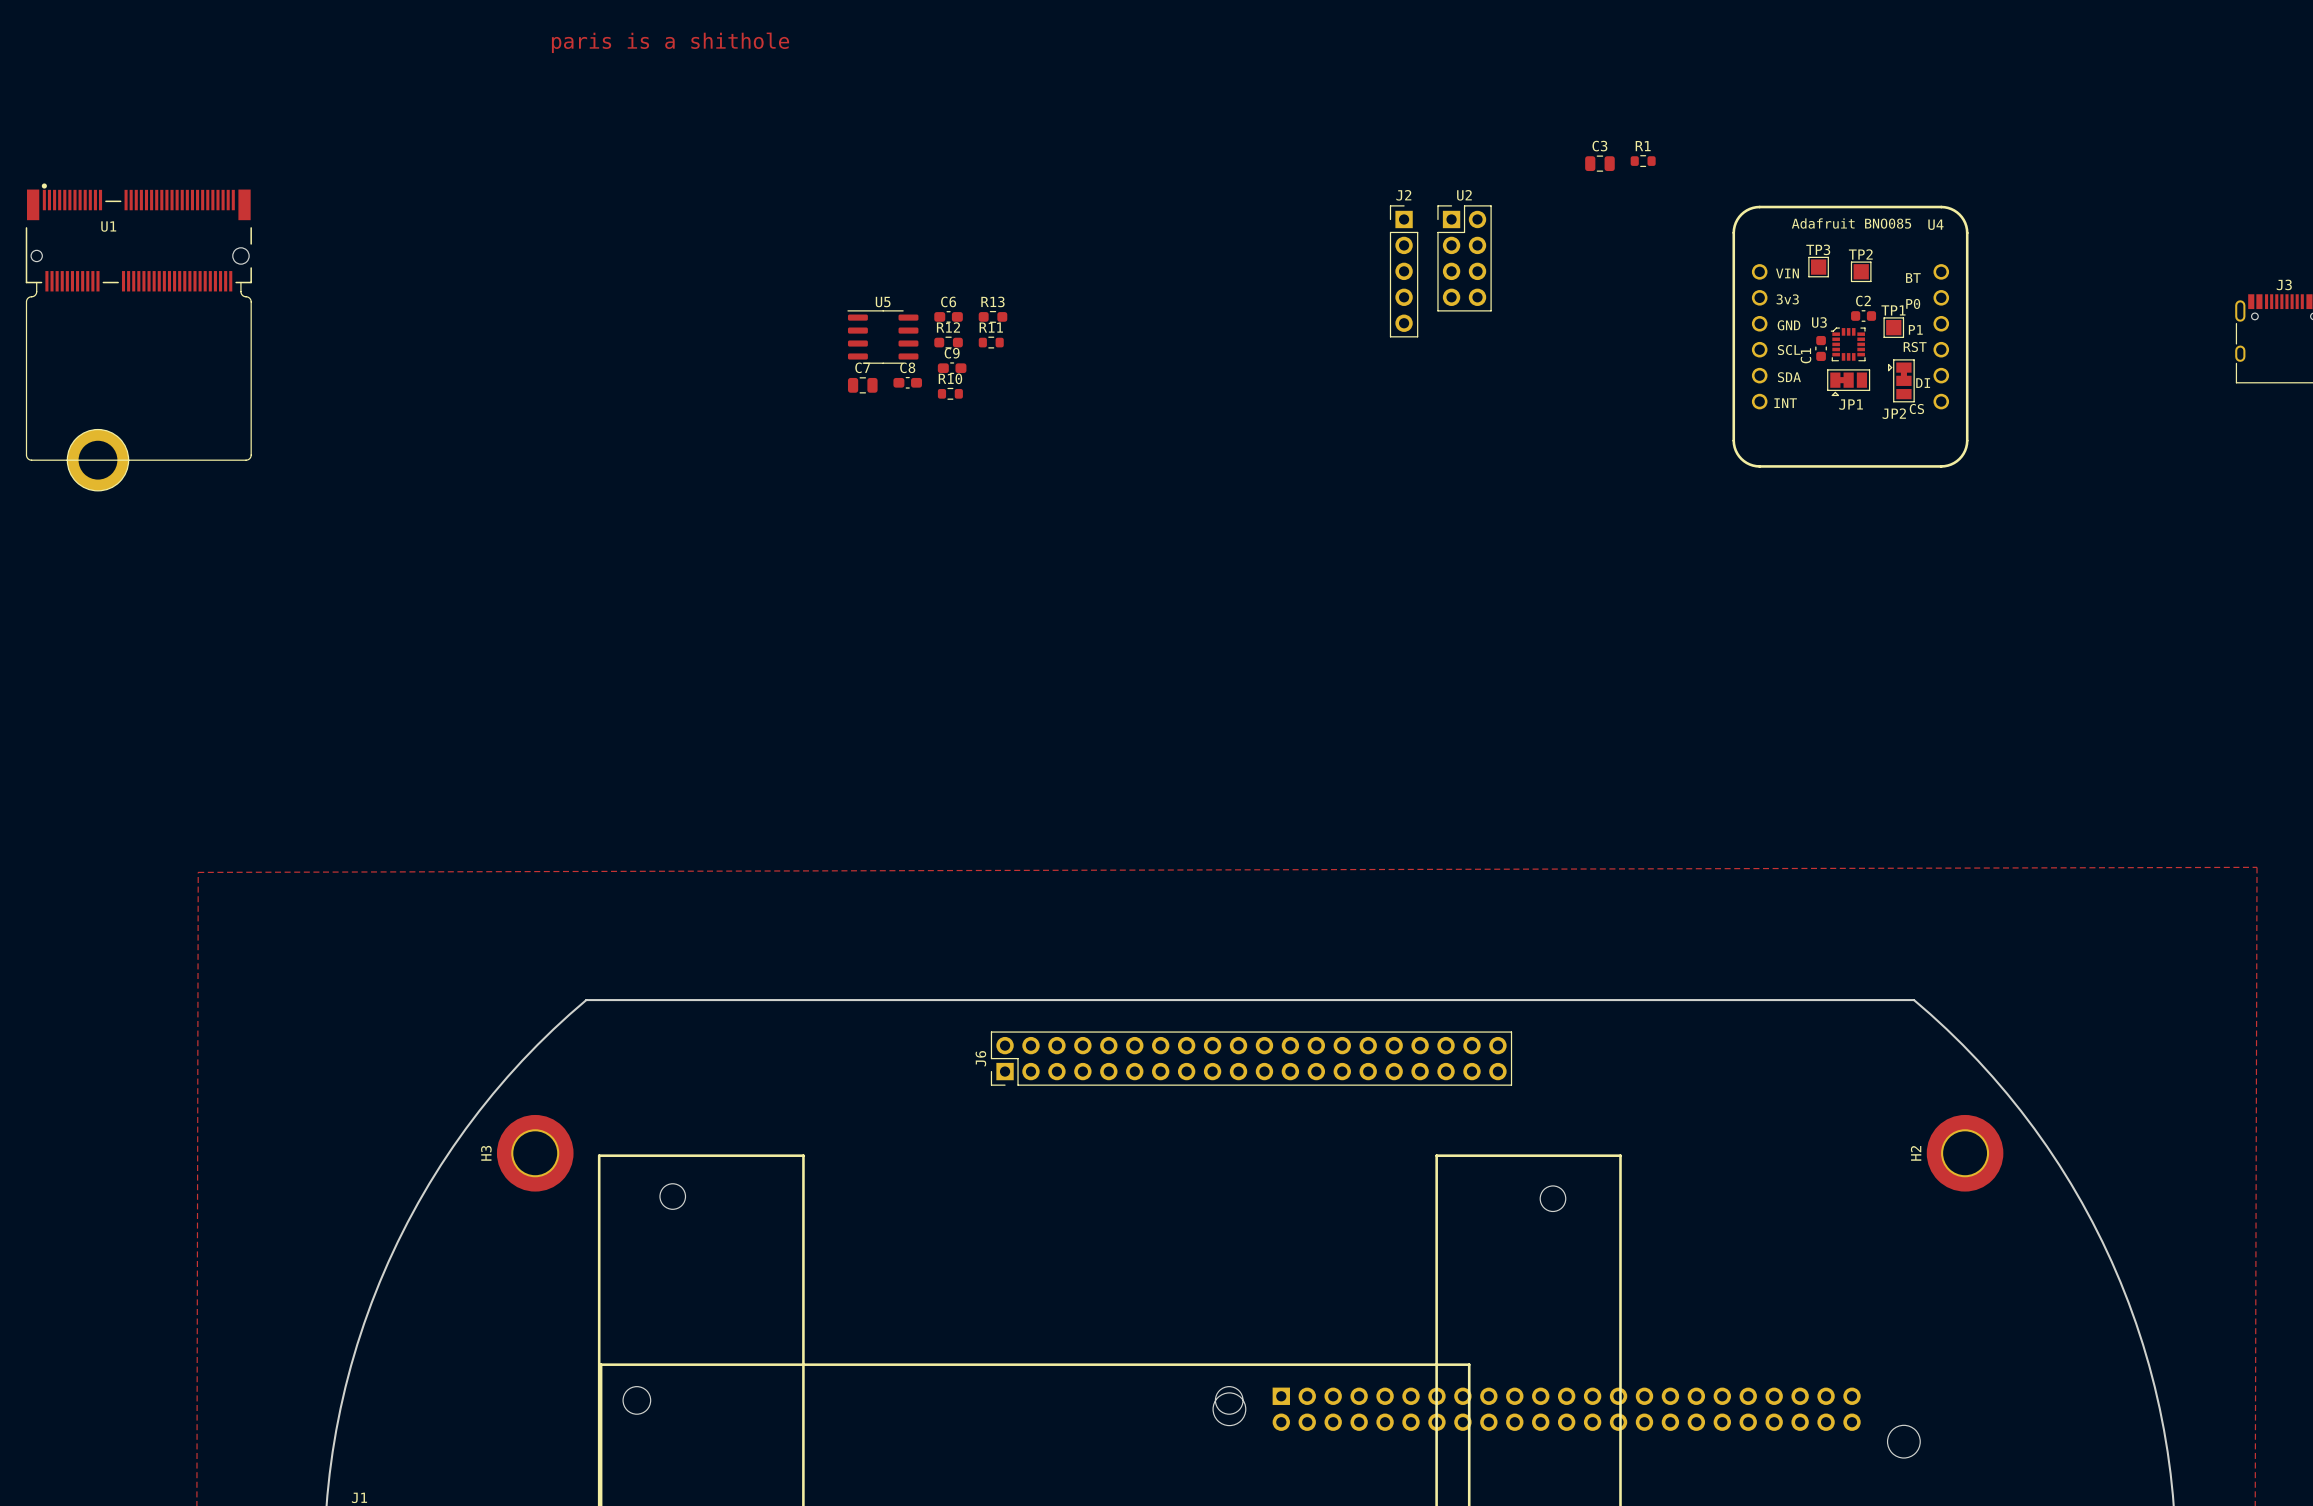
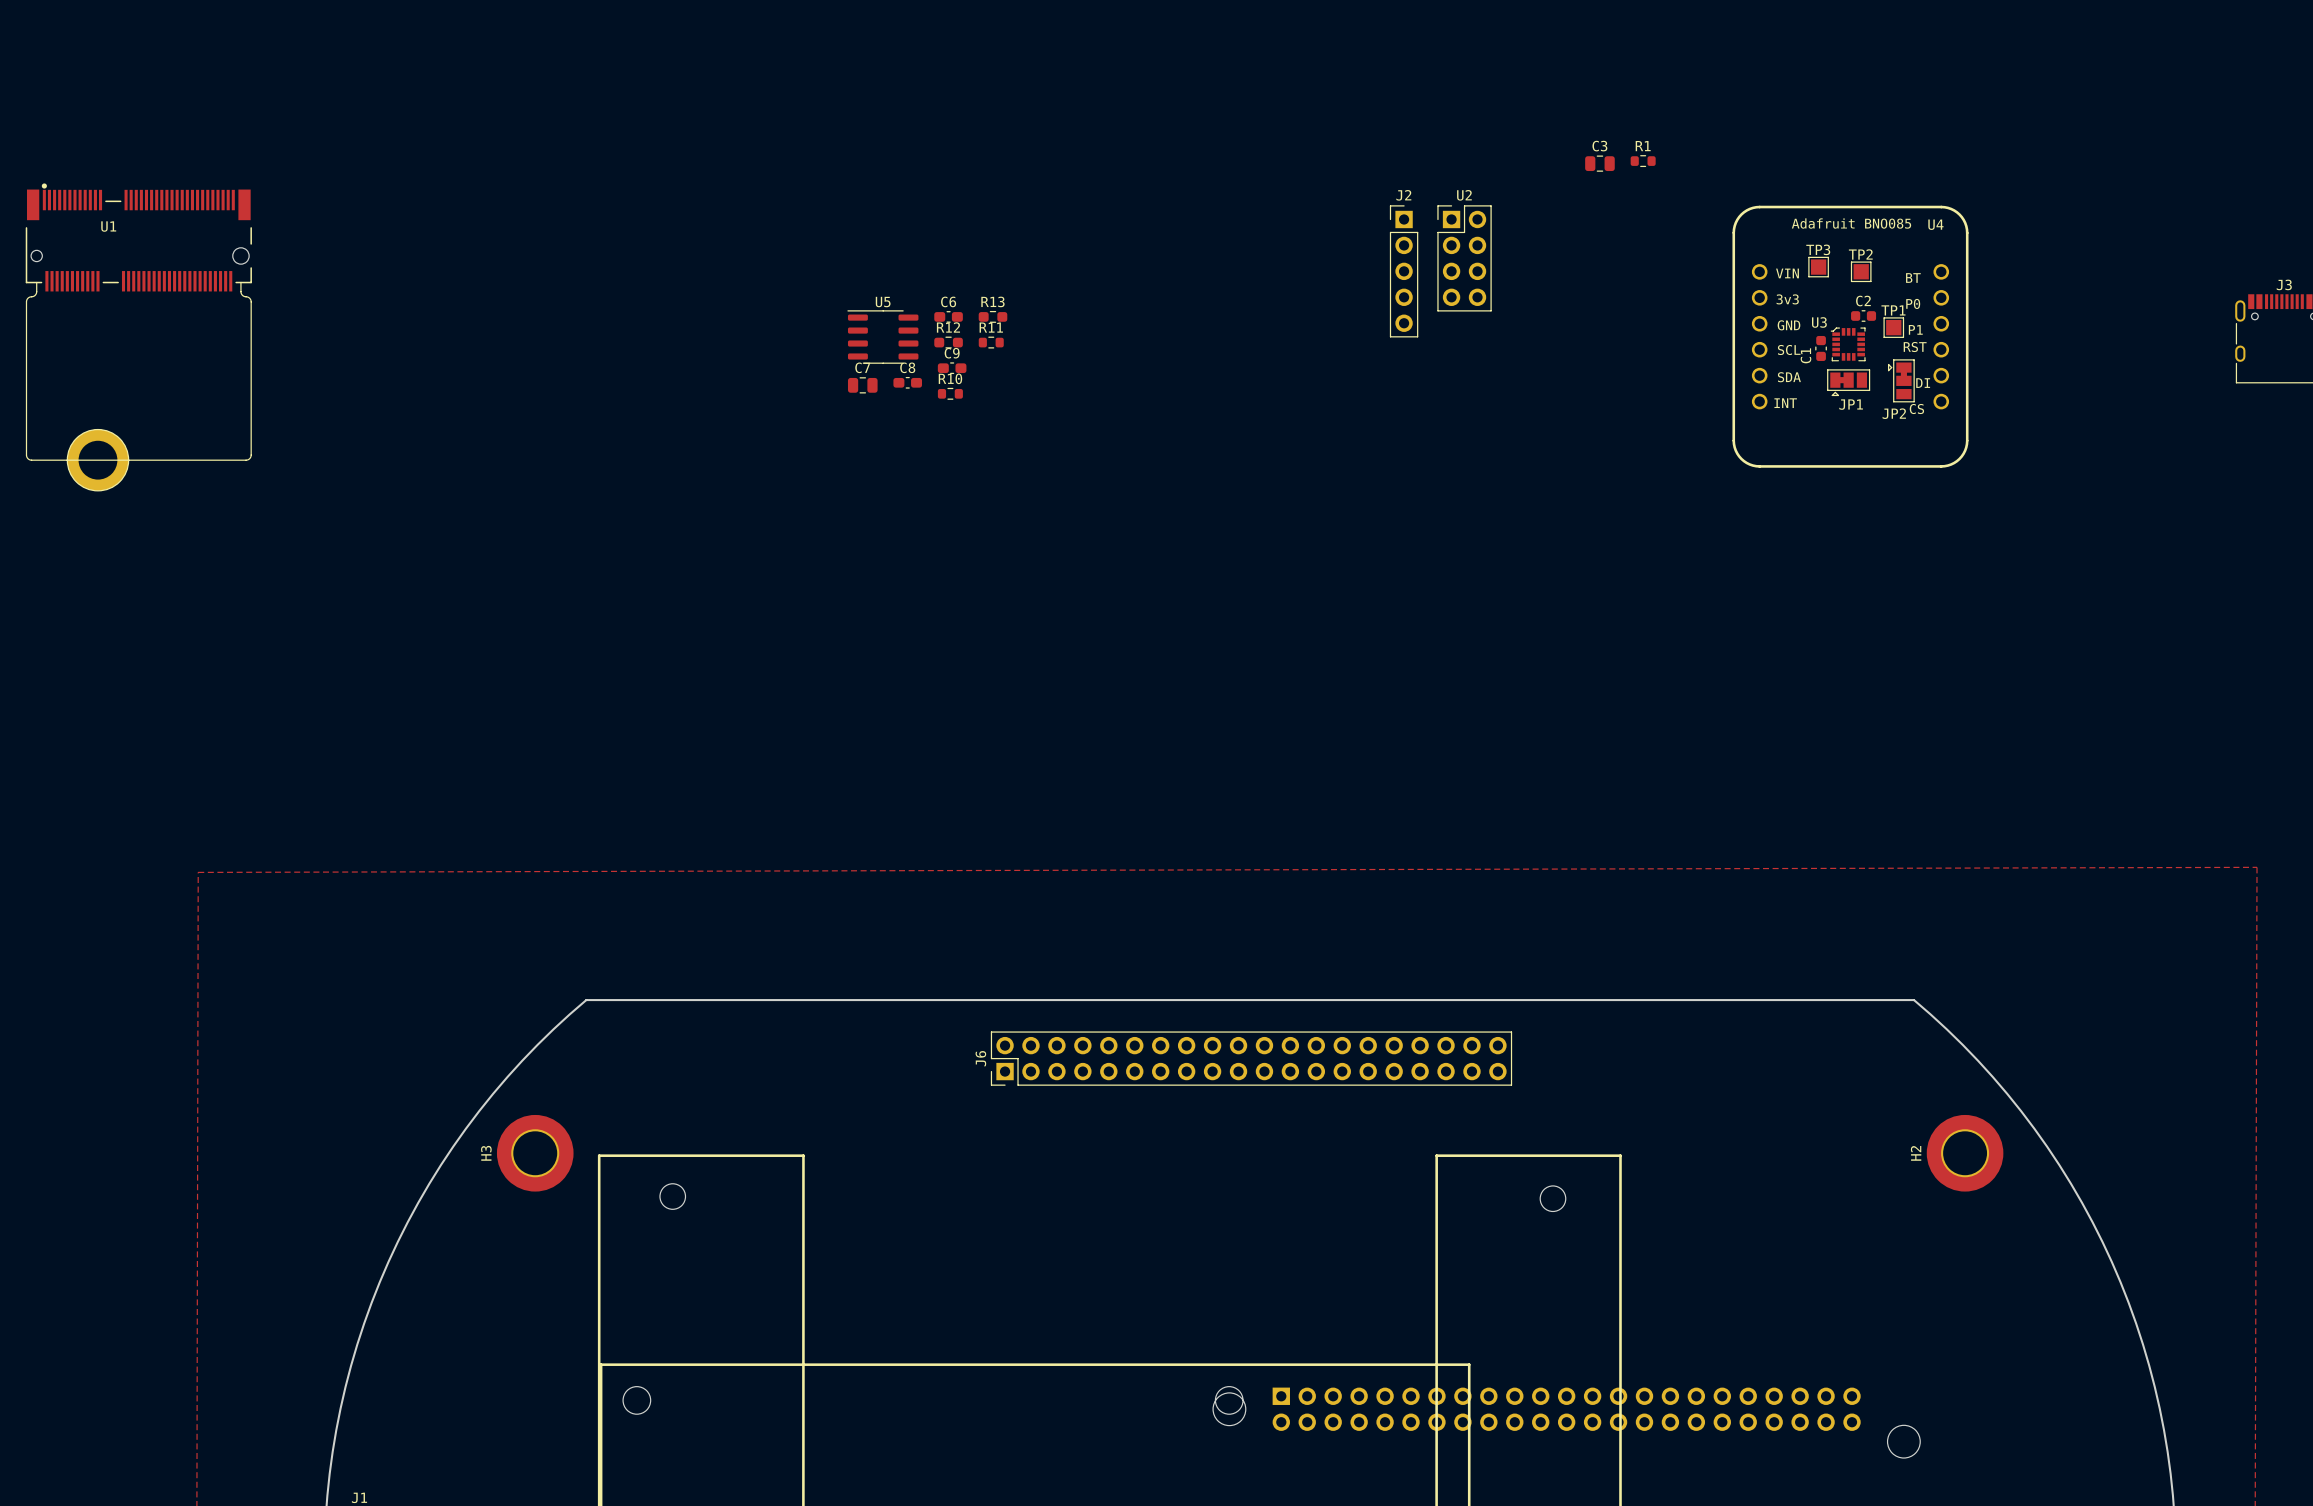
text: paris is a shithole (670, 42) -> none

